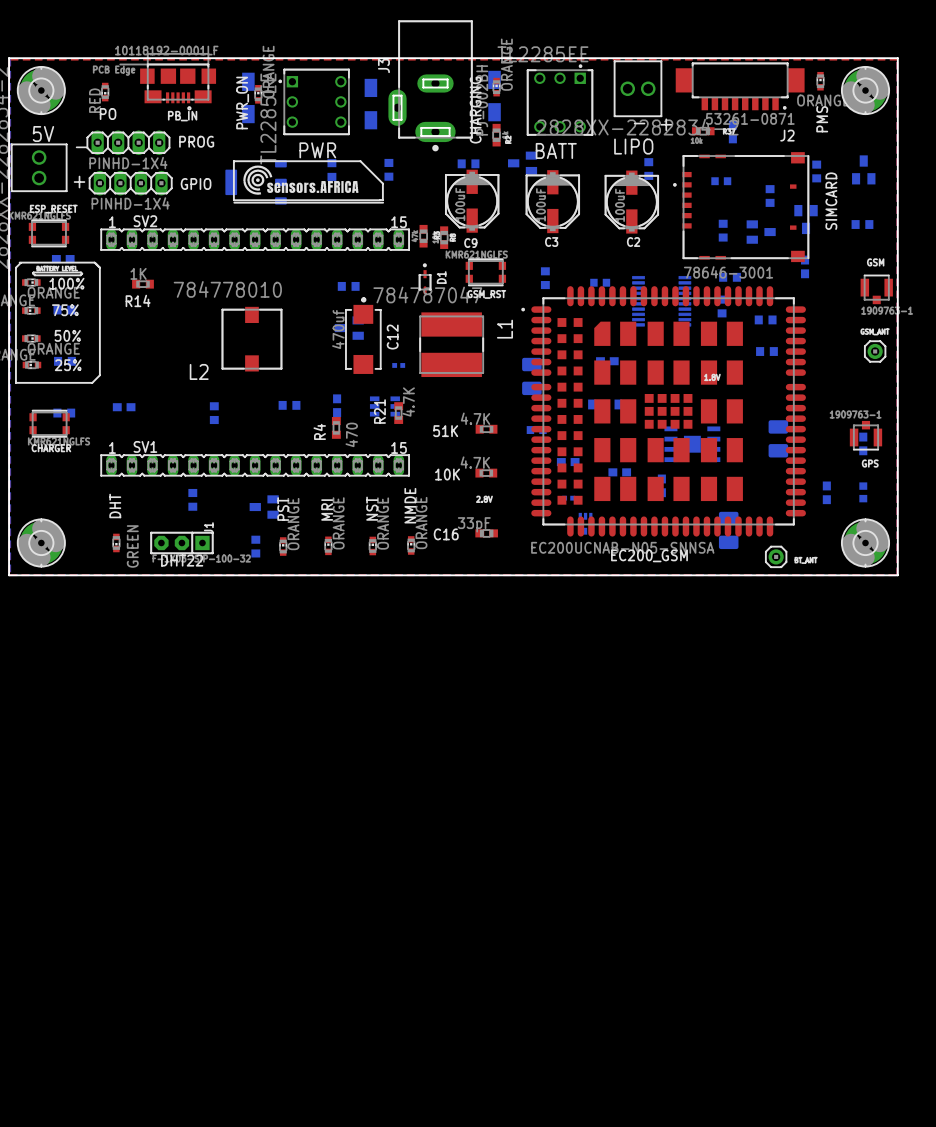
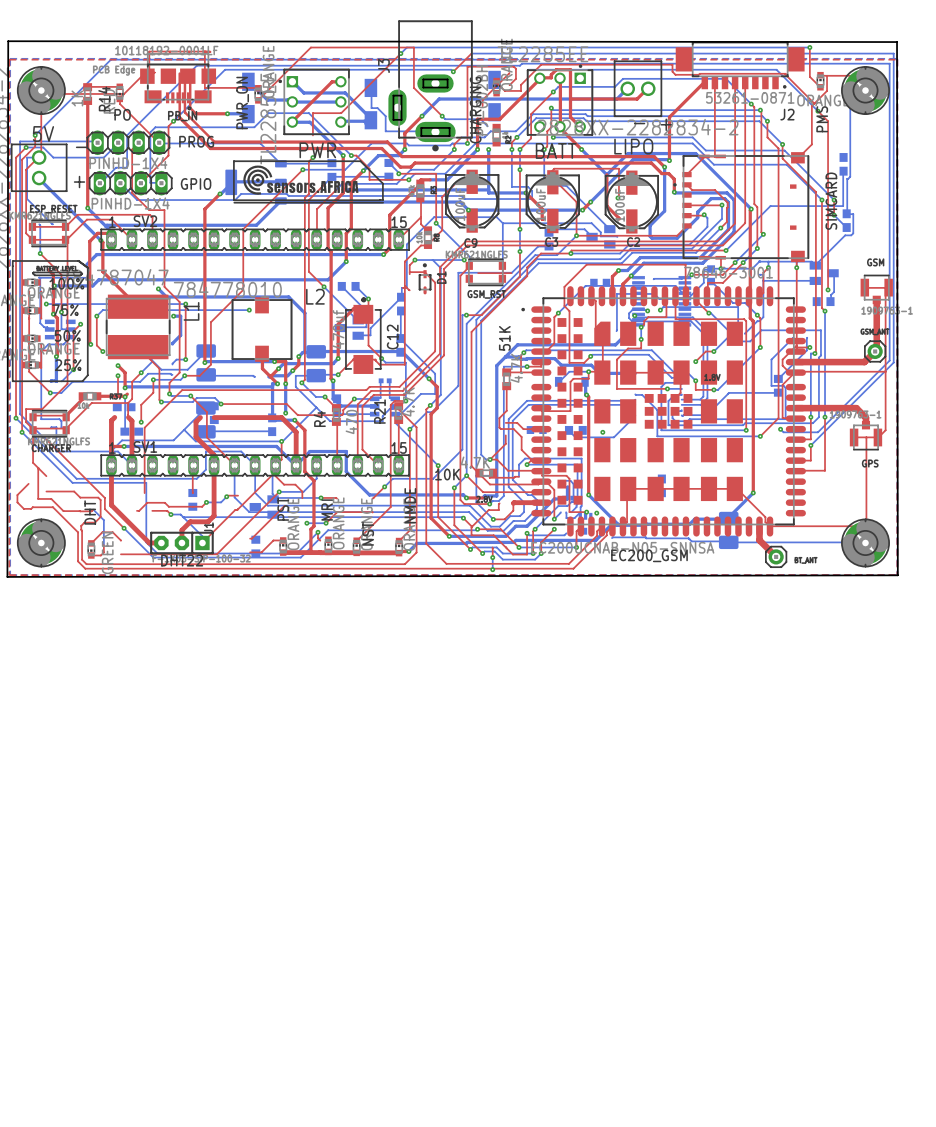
top track: none -> (809, 47) (809, 76) (820, 87)
bottom track: none -> (809, 47) (406, 47) (400, 53)
via: none -> (809, 47)
top track: none -> (400, 53) (341, 113) (312, 113) (312, 135)
via: none -> (400, 53)
top track: none -> (471, 53) (453, 71)
bottom track: none -> (471, 53) (893, 53) (893, 362) (810, 445)
board edge: (9, 58) (897, 58) (897, 575) (9, 575) (9, 58) -> (8, 41) (7, 576) (897, 575) (897, 42) (8, 41)
bottom track: none -> (517, 59) (110, 59) (35, 135)
bottom track: none -> (528, 69) (776, 69) (817, 111)
bottom track: none -> (453, 71) (451, 69) (225, 69) (173, 121)
via: none -> (453, 71)
top track: none -> (179, 73) (179, 117) (210, 148) (381, 148) (400, 167) (410, 167) (414, 163) (651, 163) (661, 173) (668, 173) (674, 179) (674, 192)
top track: none -> (184, 73) (184, 112) (214, 142) (387, 142) (402, 156) (654, 156) (664, 167)
top track: none -> (190, 73) (190, 107) (195, 113) (227, 113)
top track: none -> (509, 73) (482, 100) (482, 106)
top track: none -> (820, 75) (865, 75) (865, 90)
top track: none -> (827, 75) (827, 90) (811, 106) (811, 144) (797, 157)
top track: none -> (560, 78) (560, 128) (581, 149)
bottom track: none -> (248, 81) (267, 100) (340, 101)
bottom track: none -> (292, 81) (303, 92) (345, 92) (370, 120) (369, 122) (340, 122)
top track: none -> (340, 81) (332, 81) (292, 122)
top track: none -> (704, 82) (669, 117) (669, 160)
top track: none -> (714, 82) (714, 156)
top track: none -> (735, 82) (735, 223) (717, 241) (465, 241) (440, 267) (440, 353) (402, 390) (371, 390) (357, 404) (357, 465)
top track: none -> (745, 82) (745, 223) (722, 245) (467, 245) (444, 268) (444, 355) (404, 394) (373, 394) (362, 406) (362, 449) (378, 465)
top track: none -> (498, 84) (504, 90) (521, 90) (521, 84) (541, 64) (672, 64) (672, 71) (675, 74) (785, 73) (814, 103)
top track: none -> (509, 85) (515, 78) (515, 68) (513, 66) (467, 66) (467, 143)
top track: none -> (119, 86) (87, 87)
J2 position: (740, 86) -> (740, 65)
bottom track: none -> (370, 87) (371, 108) (377, 108) (385, 116) (385, 131) (435, 131)
top track: none -> (258, 88) (204, 87) (204, 72) (204, 71) (204, 51) (210, 51) (209, 51) (189, 51) (189, 51) (149, 51) (149, 51) (149, 52) (149, 72) (154, 72) (154, 72) (145, 72) (120, 98) (120, 104) (159, 142)
bottom track: none -> (627, 88) (616, 99) (439, 99) (422, 116)
top track: none -> (648, 88) (637, 99) (570, 99)
bottom track: none -> (865, 90) (850, 90) (850, 176) (847, 178) (846, 213) (853, 214) (853, 233) (851, 235) (845, 235) (815, 265) (811, 261) (759, 260) (752, 268) (703, 269) (703, 282) (687, 299) (659, 299) (653, 293) (616, 293) (616, 331)
top track: none -> (553, 91) (531, 114) (531, 138) (520, 149)
bottom track: none -> (553, 91) (558, 86) (614, 86) (623, 78) (726, 78) (751, 104)
via: none -> (553, 91)
PO position: (105, 92) -> (119, 92)
top track: none -> (123, 94) (123, 93) (41, 93) (41, 90) (41, 90) (41, 154) (26, 169) (26, 233) (32, 239) (66, 239) (86, 219) (111, 219) (131, 239)
top track: none -> (258, 100) (310, 47) (413, 47) (413, 87) (442, 116)
top track: none -> (87, 101) (87, 208)
top track: none -> (751, 104) (754, 107) (754, 204) (757, 207) (757, 248)
via: none -> (751, 104)
top track: none -> (551, 108) (551, 127) (547, 131) (547, 146) (544, 149)
bottom track: none -> (551, 108) (553, 110) (760, 110)
via: none -> (551, 108)
top track: none -> (760, 110) (761, 232) (763, 234)
via: none -> (760, 110)
top track: none -> (817, 111) (828, 121) (828, 289)
via: none -> (817, 111)
bottom track: none -> (227, 113) (248, 114)
via: none -> (227, 113)
top track: none -> (422, 116) (404, 133) (404, 149)
via: none -> (422, 116)
bottom track: none -> (442, 116) (445, 119) (480, 119) (487, 126)
via: none -> (442, 116)
top track: none -> (173, 121) (168, 126) (168, 155) (140, 183)
via: none -> (173, 121)
top track: none -> (767, 121) (767, 137) (778, 148) (778, 418) (760, 436)
bottom track: none -> (767, 121) (762, 116) (587, 116) (585, 114) (533, 114) (515, 131) (490, 131) (484, 137) (461, 137)
via: none -> (767, 121)
bottom track: none -> (292, 122) (309, 122) (343, 155)
top track: none -> (580, 126) (570, 117) (570, 69) (556, 69) (551, 74) (551, 77) (540, 77) (499, 119) (477, 119) (477, 149)
part position: (703, 131) -> (90, 396)
part: (732, 132) -> none
top track: none -> (35, 135) (35, 146) (22, 159) (22, 432)
via: none -> (35, 135)
top track: none -> (461, 137) (454, 144) (454, 149)
top track: none -> (516, 137) (511, 142) (511, 149)
bottom track: none -> (516, 137) (536, 118) (583, 118) (586, 121) (759, 121) (782, 144)
via: none -> (516, 137)
bottom track: none -> (553, 137) (692, 137) (705, 150) (784, 150) (834, 200)
via: none -> (553, 137)
bottom track: none -> (97, 142) (20, 141) (20, 414) (46, 439)
bottom track: none -> (118, 142) (103, 157) (53, 157) (43, 147) (26, 147)
top track: none -> (138, 142) (132, 149) (132, 192) (149, 210) (164, 210) (164, 286) (179, 302) (179, 372) (169, 382) (169, 393)
bottom track: none -> (159, 142) (260, 143) (280, 163) (331, 163)
bottom track: none -> (467, 143) (452, 143) (450, 145) (371, 143) (345, 169) (302, 169)
via: none -> (467, 143)
top track: none -> (782, 144) (782, 158) (815, 191) (814, 353)
via: none -> (782, 144)
top track: none -> (26, 147) (16, 157) (16, 418)
via: none -> (26, 147)
bottom track: none -> (404, 149) (398, 155) (378, 155) (363, 170)
via: none -> (404, 149)
bottom track: none -> (454, 149) (434, 169) (410, 169) (396, 183) (342, 183) (336, 189)
via: none -> (454, 149)
bottom track: none -> (477, 149) (447, 179) (430, 179)
via: none -> (477, 149)
bottom track: none -> (488, 149) (488, 192) (526, 192)
via: none -> (488, 149)
bottom track: none -> (511, 149) (511, 186) (528, 186) (532, 190) (532, 199) (464, 199) (461, 195) (288, 195) (286, 193) (241, 193) (235, 200) (137, 200) (120, 183)
via: none -> (511, 149)
bottom track: none -> (520, 149) (520, 169)
via: none -> (520, 149)
bottom track: none -> (544, 149) (544, 177) (552, 185) (566, 185) (609, 229)
via: none -> (544, 149)
via: none -> (552, 149)
bottom track: none -> (581, 149) (606, 174) (628, 153) (695, 153) (751, 209)
via: none -> (581, 149)
top track: none -> (343, 155) (343, 192) (328, 208) (328, 248) (331, 251) (331, 378) (333, 380)
via: none -> (343, 155)
top track: none -> (351, 155) (356, 155) (369, 168) (369, 179) (408, 179)
bottom track: none -> (351, 155) (308, 113) (268, 113) (254, 127) (155, 127) (150, 132) (150, 182) (161, 183)
via: none -> (351, 155)
top track: none -> (720, 156) (703, 156) (686, 174)
bottom track: none -> (39, 157) (27, 157) (27, 199) (53, 224)
top track: none -> (312, 157) (308, 161) (308, 193) (304, 198) (304, 379) (301, 382)
via: none -> (312, 157)
bottom track: none -> (669, 160) (633, 159) (590, 202)
via: none -> (669, 160)
bottom track: none -> (388, 162) (398, 173)
part: (468, 163) -> none
part: (522, 163) -> none
part: none -> (843, 164)
bottom track: none -> (664, 167) (664, 211) (650, 225) (650, 236) (651, 238) (677, 238) (697, 217) (697, 212) (711, 198) (724, 198) (728, 202) (728, 229) (700, 257) (640, 257) (627, 270) (618, 270)
via: none -> (664, 167)
top track: none -> (302, 169) (243, 229) (243, 289) (210, 322) (210, 364) (199, 375) (184, 375)
via: none -> (302, 169)
top track: none -> (520, 169) (520, 229)
via: none -> (520, 169)
part: (648, 169) -> none
part: (863, 169) -> none
top track: none -> (363, 170) (351, 182) (351, 228) (346, 233) (346, 261)
via: none -> (363, 170)
part: (816, 171) -> none
bottom track: none -> (843, 171) (843, 206) (770, 206) (726, 250)
top track: none -> (398, 173) (436, 173) (436, 223)
via: none -> (398, 173)
top track: none -> (606, 174) (606, 206) (619, 218)
bottom track: none -> (388, 176) (332, 176) (324, 184)
bottom track: none -> (39, 178) (100, 240)
bottom track: none -> (408, 179) (414, 173) (445, 173) (475, 143) (692, 143) (713, 164) (786, 164) (821, 200)
via: none -> (408, 179)
top track: none -> (430, 179) (421, 179) (420, 184) (389, 215) (389, 248) (383, 254)
top track: none -> (554, 179) (576, 202) (576, 235) (677, 235) (686, 225)
top track: none -> (543, 180) (554, 168) (618, 168) (617, 198)
part rotation: 0° (721, 181) -> 90° clockwise (711, 275)
part position: (721, 181) -> (711, 275)
bottom track: none -> (280, 182) (232, 181) (220, 193)
top track: none -> (457, 182) (442, 196) (442, 230) (428, 244)
bottom track: none -> (99, 183) (116, 167) (127, 167) (127, 135) (196, 65) (889, 63) (889, 360) (817, 432) (783, 432) (780, 429)
top track: none -> (324, 184) (308, 200) (308, 271) (324, 286)
top track: none -> (686, 184) (692, 190) (715, 190) (727, 202) (726, 222) (720, 228)
top track: none -> (336, 189) (316, 209) (316, 239)
bottom track: none -> (344, 189) (488, 189)
top track: none -> (526, 192) (542, 209) (543, 219)
via: none -> (526, 192)
bottom track: none -> (674, 192) (727, 192) (734, 200) (734, 231) (702, 263) (643, 263) (631, 275)
via: none -> (674, 192)
top track: none -> (220, 193) (204, 209) (204, 362)
via: none -> (220, 193)
part: (770, 196) -> none
top track: none -> (420, 197) (421, 224) (428, 230)
via: none -> (617, 198)
top track: none -> (821, 200) (821, 308) (825, 311)
via: none -> (821, 200)
top track: none -> (834, 200) (834, 215)
via: none -> (834, 200)
top track: none -> (590, 202) (582, 210)
via: none -> (590, 202)
top track: none -> (721, 205) (686, 205)
bottom track: none -> (721, 205) (721, 218) (692, 248) (630, 248) (620, 259) (536, 259) (476, 319) (476, 502) (493, 519)
via: none -> (721, 205)
bottom track: none -> (87, 208) (110, 231) (111, 239)
via: none -> (87, 208)
top track: none -> (751, 209) (748, 296) (750, 318) (753, 321) (753, 492)
via: none -> (751, 209)
via: none -> (468, 210)
bottom track: none -> (582, 210) (468, 210) (460, 202) (280, 200) (256, 225) (105, 226)
via: none -> (582, 210)
top track: none -> (704, 214) (686, 215)
bottom track: none -> (704, 214) (707, 218) (707, 226) (689, 244) (629, 244) (620, 253) (570, 253)
via: none -> (704, 214)
bottom track: none -> (834, 215) (846, 227)
via: none -> (834, 215)
top track: none -> (421, 217) (398, 239)
part: (806, 219) -> none
part: none -> (846, 220)
bottom track: none -> (436, 223) (470, 257) (469, 266)
via: none -> (436, 223)
bottom track: none -> (502, 223) (502, 266)
bottom track: none -> (502, 223) (591, 223) (600, 232) (600, 236) (617, 236)
bottom track: none -> (502, 223) (496, 217) (434, 217) (406, 244) (406, 287) (401, 287) (401, 296) (370, 328) (370, 335) (358, 335)
bottom track: none -> (39, 224) (40, 253)
part: (862, 224) -> none
top track: none -> (32, 226) (65, 226) (77, 214) (149, 214) (152, 217) (152, 239)
bottom track: none -> (720, 228) (696, 252) (632, 252) (621, 263) (538, 263) (481, 320) (481, 454) (486, 459) (490, 459)
via: none -> (720, 228)
bottom track: none -> (520, 229) (520, 251)
via: none -> (520, 229)
part: (723, 230) -> none
bottom track: none -> (549, 232) (552, 229) (584, 229) (592, 236)
part: (761, 232) -> none
bottom track: none -> (763, 234) (735, 262)
via: none -> (763, 234)
bottom track: none -> (576, 235) (557, 255) (535, 255) (466, 323) (466, 475) (454, 487)
via: none -> (576, 235)
part position: (423, 236) -> (420, 190)
part: none -> (600, 236)
part position: (444, 237) -> (428, 237)
top track: none -> (65, 239) (67, 241) (67, 383) (42, 409) (26, 409) (26, 422) (33, 428)
top track: none -> (111, 239) (110, 233) (97, 233) (89, 241) (90, 344)
top track: none -> (100, 240) (102, 242) (102, 271) (138, 306)
via: none -> (100, 240)
top track: none -> (428, 244) (421, 245) (404, 261) (404, 285) (409, 290)
bottom track: none -> (549, 246) (538, 246) (511, 272) (458, 272) (458, 385) (432, 412) (427, 412) (409, 429)
bottom track: none -> (757, 248) (743, 262)
via: none -> (757, 248)
top track: none -> (726, 250) (571, 250) (570, 253) (541, 253) (527, 267) (527, 276) (471, 331) (471, 466) (489, 484) (538, 484) (541, 481) (546, 481) (554, 489) (554, 519)
via: none -> (726, 250)
top track: none -> (520, 251) (520, 276) (481, 315) (466, 315)
via: none -> (520, 251)
top track: none -> (40, 253) (61, 274) (61, 312)
via: none -> (40, 253)
via: none -> (570, 253)
bottom track: none -> (383, 254) (96, 254) (86, 264)
via: none -> (383, 254)
top track: none -> (797, 256) (795, 351)
top track: none -> (704, 257) (720, 257) (720, 268)
part: (63, 259) -> none
line: none -> (13, 260) (78, 260) (87, 267)
line: none -> (78, 260) (87, 267) (87, 375) (82, 381) (12, 381) (12, 261)
top track: none -> (414, 260) (409, 265) (409, 274)
bottom track: none -> (414, 260) (464, 260)
via: none -> (414, 260)
bottom track: none -> (432, 260) (440, 268) (440, 394) (430, 405)
via: none -> (464, 260)
bottom track: none -> (346, 261) (328, 279) (98, 279) (92, 285) (54, 285)
via: none -> (346, 261)
bottom track: none -> (768, 261) (768, 267)
line: (19, 262) (94, 262) (99, 267) -> none
line: (20, 262) (15, 267) (15, 382) (92, 382) (99, 375) (99, 267) (95, 263) -> none
top track: none -> (735, 262) (723, 274) (691, 274)
via: none -> (735, 262)
top track: none -> (743, 262) (723, 282) (707, 282) (706, 296)
via: none -> (743, 262)
top track: none -> (469, 266) (460, 275) (460, 499) (464, 504) (489, 504)
part: (805, 266) -> none
top track: none -> (768, 267) (763, 272) (763, 292) (759, 296)
via: none -> (768, 267)
via: none -> (796, 267)
via: none -> (720, 268)
top track: none -> (48, 269) (53, 274) (53, 314) (57, 318) (56, 356)
top track: none -> (618, 270) (612, 276) (612, 296)
via: none -> (618, 270)
top track: none -> (409, 272) (424, 272) (435, 282) (435, 351) (399, 386) (369, 386) (366, 390) (182, 390) (144, 427) (144, 493)
top track: none -> (478, 273) (511, 273)
part: none -> (824, 273)
bottom track: none -> (833, 273) (834, 291) (831, 294) (830, 301)
bottom track: none -> (691, 274) (688, 277) (681, 278) (653, 279)
via: none -> (691, 274)
bottom track: none -> (759, 274) (763, 274) (763, 317) (744, 333)
top track: none -> (631, 275) (622, 284) (622, 296)
via: none -> (631, 275)
part: (730, 277) -> none
bottom track: none -> (86, 278) (39, 277) (40, 323) (49, 329)
part position: (545, 278) -> (549, 239)
bottom track: none -> (763, 280) (815, 280)
bottom track: none -> (711, 281) (733, 303) (745, 303) (757, 315)
R14 rotation: 0° (142, 284) -> 90° clockwise (87, 94)
R14 position: (142, 284) -> (87, 94)
via: none -> (54, 285)
bottom track: none -> (324, 286) (358, 320)
via: none -> (324, 286)
bottom track: none -> (341, 286) (366, 311) (366, 327) (340, 328)
bottom track: none -> (355, 286) (368, 299)
top track: none -> (405, 286) (404, 364) (379, 364) (375, 359) (353, 358) (338, 374)
top track: none -> (402, 287) (404, 287)
top track: none -> (864, 287) (888, 287) (885, 287) (885, 430) (878, 437) (854, 437)
bottom track: none -> (158, 288) (166, 296) (288, 296) (304, 313) (304, 352)
via: none -> (158, 288)
via: none -> (828, 289)
top track: none -> (29, 291) (29, 371) (50, 392)
top track: none -> (41, 291) (41, 318)
bottom track: none -> (682, 292) (675, 285) (585, 285) (558, 313)
top track: none -> (591, 296) (595, 301) (595, 327) (602, 334) (602, 371) (588, 371) (588, 378) (573, 378) (570, 381) (570, 411) (542, 411) (541, 408) (541, 418)
top track: none -> (664, 296) (666, 317) (648, 317) (641, 327)
top track: none -> (675, 296) (675, 319) (744, 319) (746, 321) (746, 430)
top track: none -> (685, 296) (685, 264) (586, 264) (564, 286) (564, 306) (569, 311) (569, 362) (584, 362) (590, 356)
top track: none -> (696, 296) (696, 301) (708, 313)
top track: none -> (368, 299) (368, 345) (381, 358)
via: none -> (368, 299)
top track: none -> (876, 299) (876, 349) (864, 362) (795, 362)
R14 name position: R14 (138, 300) -> R14 (104, 98)
part: none -> (823, 301)
bottom track: none -> (46, 304) (185, 304)
via: none -> (46, 304)
top track: none -> (185, 304) (185, 359)
via: none -> (185, 304)
part: none -> (401, 304)
part: (722, 306) -> none
top track: none -> (353, 308) (338, 324) (338, 358)
part: (64, 310) -> none
bottom track: none -> (249, 310) (102, 310) (96, 316)
via: none -> (249, 310)
bottom track: none -> (401, 310) (400, 338) (435, 373) (435, 393) (421, 393) (400, 414) (395, 414) (395, 423) (438, 465)
bottom track: none -> (647, 310) (632, 310) (629, 313) (629, 318) (632, 321) (691, 321) (703, 333) (703, 396) (700, 399) (681, 399)
via: none -> (647, 310)
bottom track: none -> (660, 310) (663, 307) (738, 307) (738, 339) (740, 341) (750, 341) (761, 330) (820, 330) (818, 417) (812, 423) (668, 425) (668, 401) (674, 394) (681, 394)
via: none -> (660, 310)
bottom track: none -> (825, 311) (825, 417)
via: none -> (825, 311)
bottom track: none -> (61, 312) (61, 329) (70, 329)
via: none -> (61, 312)
top track: none -> (558, 313) (554, 317) (554, 343) (546, 351) (541, 351)
via: none -> (558, 313)
bottom track: none -> (708, 313) (731, 333) (713, 351)
via: none -> (708, 313)
via: none -> (53, 314)
bottom track: none -> (466, 315) (462, 315) (462, 449) (433, 478) (392, 478) (384, 486)
via: none -> (466, 315)
bottom track: none -> (634, 315) (636, 317) (692, 317) (707, 331) (707, 398) (700, 404) (681, 404)
via: none -> (634, 315)
top track: none -> (757, 315) (760, 318) (760, 347)
via: none -> (757, 315)
top track: none -> (96, 316) (96, 345) (102, 351)
via: none -> (96, 316)
bottom track: none -> (173, 316) (180, 316) (180, 335) (172, 344)
via: none -> (173, 316)
part: (765, 319) -> none
top track: none -> (80, 324) (73, 331) (73, 369)
via: none -> (80, 324)
bottom track: none -> (641, 327) (641, 339)
via: none -> (641, 327)
part: none -> (60, 329)
bottom track: none -> (629, 331) (615, 344) (517, 344) (496, 365) (496, 495) (484, 495) (482, 497)
bottom track: none -> (70, 337) (63, 344) (48, 344) (41, 351) (41, 419) (59, 419) (61, 427)
bottom track: none -> (793, 337) (771, 359) (771, 385) (783, 385) (785, 387) (785, 419) (689, 419) (687, 421) (675, 421) (672, 418) (672, 411) (681, 410)
bottom track: none -> (807, 337) (806, 350) (778, 378)
L2 position: (251, 339) -> (262, 329)
top track: none -> (641, 339) (641, 348) (628, 348) (616, 359) (616, 388) (667, 388)
via: none -> (641, 339)
top track: none -> (41, 344) (41, 368)
via: none -> (90, 344)
L1 position: (451, 344) -> (138, 326)
part: none -> (400, 345)
top track: none -> (796, 345) (782, 359) (782, 365) (791, 374) (795, 372)
top track: none -> (138, 347) (159, 368) (159, 400) (161, 402)
bottom track: none -> (760, 347) (717, 389) (713, 389)
via: none -> (760, 347)
top track: none -> (796, 347) (809, 347)
via: none -> (809, 347)
top track: none -> (41, 350) (50, 350)
via: none -> (102, 351)
bottom track: none -> (206, 351) (187, 369) (161, 369) (151, 359) (152, 361) (141, 372)
top track: none -> (713, 351) (705, 351) (695, 361)
via: none -> (713, 351)
part: (766, 351) -> none
top track: none -> (523, 352) (521, 355) (521, 372)
bottom track: none -> (523, 352) (526, 350) (651, 350) (674, 372) (687, 372) (695, 380)
via: none -> (523, 352)
top track: none -> (262, 353) (262, 368) (277, 383)
bottom track: none -> (814, 353) (810, 353) (810, 417)
via: none -> (814, 353)
bottom track: none -> (56, 356) (56, 381)
via: none -> (56, 356)
top track: none -> (298, 356) (298, 364) (292, 370)
bottom track: none -> (298, 356) (302, 352) (316, 351) (399, 351) (429, 378)
via: none -> (298, 356)
bottom track: none -> (505, 356) (518, 356) (521, 359) (554, 358) (561, 365) (591, 365) (599, 373) (635, 373)
bottom track: none -> (590, 356) (592, 354) (648, 354) (671, 377) (681, 378)
via: none -> (590, 356)
bottom track: none -> (338, 358) (333, 363) (283, 363) (278, 368)
via: none -> (338, 358)
bottom track: none -> (381, 358) (385, 362) (405, 362) (405, 401)
via: none -> (381, 358)
bottom track: none -> (185, 359) (176, 359) (172, 364)
via: none -> (185, 359)
part: (64, 361) -> none
top track: none -> (274, 361) (285, 361) (285, 383)
bottom track: none -> (274, 361) (204, 362)
via: none -> (274, 361)
part: (607, 361) -> none
via: none -> (695, 361)
via: none -> (204, 362)
part: none -> (206, 362)
top track: none -> (541, 362) (541, 366) (527, 366)
part: none -> (316, 363)
top track: none -> (118, 365) (125, 372) (125, 387)
via: none -> (118, 365)
part position: (398, 365) -> (385, 380)
bottom track: none -> (527, 366) (503, 366) (503, 495) (498, 501) (492, 501) (489, 504)
via: none -> (527, 366)
top track: none -> (278, 368) (270, 376)
via: none -> (278, 368)
bottom track: none -> (73, 369) (61, 381)
via: none -> (73, 369)
bottom track: none -> (292, 370) (287, 375) (268, 376)
via: none -> (292, 370)
L2 name position: L2 (199, 371) -> L2 (315, 296)
bottom track: none -> (588, 371) (569, 371) (558, 381)
via: none -> (588, 371)
top track: none -> (885, 371) (795, 372)
top track: none -> (141, 372) (132, 381) (132, 398) (128, 403)
via: none -> (141, 372)
top track: none -> (506, 372) (541, 372)
top track: none -> (628, 372) (680, 372) (680, 392) (675, 398)
top track: none -> (795, 372) (782, 384) (782, 418) (795, 418)
bottom track: none -> (172, 374) (148, 373) (140, 381) (72, 381) (61, 392) (50, 392)
bottom track: none -> (206, 374) (255, 376)
bottom track: none -> (338, 374) (295, 375) (295, 386) (330, 421) (382, 421) (382, 416) (395, 406)
via: none -> (338, 374)
top track: none -> (118, 375) (118, 396)
via: none -> (118, 375)
bottom track: none -> (184, 375) (180, 379) (153, 379)
via: none -> (184, 375)
part: (531, 376) -> none
top track: none -> (429, 378) (437, 386) (437, 408) (431, 414) (431, 518) (449, 536)
via: none -> (429, 378)
top track: none -> (153, 379) (153, 392) (141, 404) (141, 422)
via: none -> (153, 379)
bottom track: none -> (56, 380) (51, 381)
bottom track: none -> (333, 380) (333, 398) (341, 406) (374, 406)
via: none -> (333, 380)
bottom track: none -> (381, 380) (380, 397) (354, 398)
bottom track: none -> (389, 380) (389, 397) (395, 398)
top track: none -> (695, 380) (695, 389) (713, 389)
via: none -> (695, 380)
bottom track: none -> (585, 381) (586, 394)
bottom track: none -> (301, 382) (315, 396) (325, 396)
via: none -> (301, 382)
bottom track: none -> (277, 383) (272, 383) (272, 417) (275, 420) (294, 420)
via: none -> (277, 383)
bottom track: none -> (285, 383) (285, 413)
via: none -> (285, 383)
bottom track: none -> (681, 383) (665, 382) (661, 386) (661, 430) (746, 430)
part: none -> (778, 385)
bottom track: none -> (272, 386) (125, 387)
top track: none -> (506, 386) (506, 410) (499, 418) (499, 427) (513, 429) (521, 436) (521, 449) (532, 460) (541, 460)
via: none -> (125, 387)
bottom track: none -> (667, 388) (681, 389)
via: none -> (667, 388)
via: none -> (713, 389)
via: none -> (50, 392)
bottom track: none -> (778, 392) (729, 392) (706, 415) (681, 415)
bottom track: none -> (169, 393) (171, 395) (190, 395)
via: none -> (169, 393)
top track: none -> (127, 394) (125, 396) (96, 396)
top track: none -> (586, 394) (588, 396) (588, 494)
via: none -> (586, 394)
bottom track: none -> (635, 394) (642, 394) (657, 410) (657, 436) (760, 436)
top track: none -> (190, 395) (206, 412) (206, 437) (234, 465)
via: none -> (190, 395)
top track: none -> (83, 396) (83, 398) (66, 415) (33, 415)
bottom track: none -> (125, 396) (124, 431)
via: none -> (125, 396)
top track: none -> (325, 396) (336, 408)
via: none -> (325, 396)
top track: none -> (354, 398) (343, 410) (342, 415) (297, 415) (286, 404) (221, 404)
via: none -> (354, 398)
bottom track: none -> (635, 399) (527, 400) (508, 419) (508, 487) (524, 502) (524, 512) (520, 516) (510, 516) (499, 526) (490, 526) (469, 505) (267, 505) (255, 492) (255, 465) (241, 451) (205, 451) (205, 469) (196, 478) (76, 478) (16, 418)
top track: none -> (405, 401) (394, 401) (390, 405) (390, 507) (356, 540)
via: none -> (405, 401)
bottom track: none -> (161, 402) (192, 402) (196, 397) (214, 397) (221, 404)
via: none -> (161, 402)
top track: none -> (128, 403) (91, 403) (66, 428) (33, 428)
top track: none -> (128, 403) (128, 417) (131, 420) (131, 465)
via: none -> (221, 404)
part position: (604, 404) -> (571, 381)
bottom track: none -> (635, 404) (528, 404) (512, 420) (512, 479) (528, 495) (532, 495) (536, 499) (536, 508) (524, 521) (513, 521) (503, 530) (487, 530) (469, 512) (249, 512) (234, 497) (234, 465)
part: (289, 405) -> none
top track: none -> (430, 405) (426, 409) (426, 543) (446, 563) (568, 563) (597, 535) (597, 531) (601, 526)
via: none -> (430, 405)
bottom track: none -> (316, 407) (282, 441) (195, 441) (184, 429)
bottom track: none -> (205, 408) (173, 440) (122, 440) (110, 451)
top track: none -> (795, 408) (856, 408) (865, 417) (865, 425)
top track: none -> (398, 409) (416, 427) (416, 552) (404, 564) (86, 564) (82, 559) (81, 525) (84, 522) (95, 522) (100, 516) (100, 499) (98, 497) (80, 497) (74, 491) (46, 491)
part: (64, 413) -> none
via: none -> (285, 413)
bottom track: none -> (334, 413) (374, 414)
bottom track: none -> (635, 415) (613, 437) (575, 437) (569, 430)
top track: none -> (114, 417) (111, 420) (111, 505) (149, 542) (161, 542)
top track: none -> (200, 417) (195, 422) (195, 436) (214, 455) (214, 515) (208, 521) (190, 521) (181, 530) (181, 542)
top track: none -> (214, 417) (281, 417) (296, 432) (296, 465)
top track: none -> (810, 417) (810, 439) (795, 439)
via: none -> (810, 417)
top track: none -> (825, 417) (825, 470) (795, 471)
via: none -> (825, 417)
via: none -> (16, 418)
part: none -> (205, 419)
top track: none -> (294, 420) (304, 430) (304, 471) (313, 480) (313, 526) (310, 529) (310, 552)
via: none -> (294, 420)
top track: none -> (336, 421) (337, 465)
via: none -> (141, 422)
top track: none -> (505, 422) (517, 422) (523, 429) (541, 429)
top track: none -> (398, 423) (398, 465)
part: none -> (272, 424)
bottom track: none -> (51, 427) (56, 427) (56, 451) (118, 451) (131, 465)
R4 position: (336, 427) -> (336, 414)
top track: none -> (33, 428) (33, 462) (46, 476)
top track: none -> (409, 429) (409, 530) (399, 541)
via: none -> (409, 429)
51K rotation: 0° (486, 429) -> 90° clockwise (506, 379)
51K position: (486, 429) -> (506, 379)
via: none -> (780, 429)
part: none -> (575, 430)
via: none -> (746, 430)
part: none -> (131, 431)
bottom track: none -> (272, 431) (205, 431)
bottom track: none -> (22, 432) (72, 482) (146, 482) (146, 542) (157, 553) (296, 553) (318, 532)
via: none -> (22, 432)
via: none -> (602, 432)
top track: none -> (505, 435) (505, 443) (490, 459) (496, 459) (508, 470) (536, 470) (542, 471) (542, 475) (566, 475) (569, 478) (569, 512) (586, 512)
via: none -> (760, 436)
top track: none -> (866, 437) (866, 542) (865, 542) (866, 526) (770, 526) (770, 526) (765, 522) (765, 517) (738, 489) (709, 488)
part: (778, 438) -> none
top track: none -> (46, 439) (104, 497) (104, 509) (124, 528)
top track: none -> (281, 441) (281, 459) (275, 465)
via: none -> (281, 441)
part: (863, 443) -> none
part: (692, 444) -> none
top track: none -> (810, 445) (810, 460) (795, 460)
via: none -> (810, 445)
top track: none -> (111, 446) (124, 446)
bottom track: none -> (124, 446) (276, 446) (296, 465) (309, 451) (346, 451) (346, 471) (369, 494) (463, 494) (466, 497)
via: none -> (124, 446)
via: none -> (490, 459)
top track: none -> (531, 459) (527, 464)
part: (568, 462) -> none
bottom track: none -> (527, 464) (577, 464) (577, 504) (571, 512)
via: none -> (527, 464)
top track: none -> (193, 465) (192, 492)
top track: none -> (275, 465) (275, 476) (284, 484) (295, 484) (302, 491) (302, 498)
top track: none -> (275, 465) (275, 471) (202, 542)
bottom track: none -> (275, 465) (272, 465) (272, 493) (276, 497) (321, 497)
bottom track: none -> (316, 465) (316, 478) (303, 491) (279, 491)
top track: none -> (438, 465) (438, 517) (470, 549)
via: none -> (438, 465)
top track: none -> (38, 468) (38, 498) (51, 498) (63, 511) (91, 511) (93, 509)
part: (619, 472) -> none
top track: none -> (466, 475) (483, 492) (541, 492)
via: none -> (466, 475)
top track: none -> (489, 475) (489, 477) (518, 476)
bottom track: none -> (518, 476) (518, 464) (525, 458) (581, 458) (580, 512) (574, 518) (566, 518) (566, 512)
top track: none -> (28, 483) (17, 495) (17, 502) (23, 508) (52, 507) (78, 532) (78, 561) (85, 568) (573, 568) (606, 535) (606, 532) (612, 526)
top track: none -> (384, 486) (372, 498)
via: none -> (384, 486)
bottom track: none -> (559, 486) (560, 480) (570, 480) (573, 483) (573, 502) (567, 506) (558, 506) (535, 529)
bottom track: none -> (567, 486) (567, 498) (554, 498) (527, 526) (515, 526) (505, 536) (449, 536)
top track: none -> (454, 487) (454, 525) (482, 553)
via: none -> (454, 487)
top track: none -> (681, 488) (708, 488)
top track: none -> (681, 488) (628, 488) (627, 522) (622, 526)
top track: none -> (279, 491) (216, 554) (120, 554)
via: none -> (279, 491)
bottom track: none -> (753, 492) (728, 519) (694, 519) (688, 524) (611, 524) (595, 540) (416, 543) (408, 551)
via: none -> (753, 492)
part: (826, 492) -> none
part: (863, 492) -> none
bottom track: none -> (588, 494) (617, 525)
via: none -> (588, 494)
top track: none -> (238, 495) (226, 496)
bottom track: none -> (226, 496) (221, 502) (206, 502)
via: none -> (226, 496)
top track: none -> (321, 497) (337, 498)
via: none -> (321, 497)
top track: none -> (466, 497) (482, 497)
via: none -> (466, 497)
top track: none -> (206, 502) (202, 506) (168, 506) (164, 502) (147, 502) (136, 510)
via: none -> (206, 502)
top track: none -> (541, 502) (514, 502) (513, 510) (504, 519) (493, 519)
top track: none -> (499, 503) (498, 510) (488, 510) (471, 527) (471, 535) (493, 535) (512, 554) (527, 554) (527, 533)
via: none -> (489, 504)
top track: none -> (284, 505) (250, 538)
NST name position: NST (372, 508) -> NST (368, 533)
bottom track: none -> (93, 509) (103, 520) (103, 545)
top track: none -> (152, 510) (167, 510) (170, 514)
top track: none -> (372, 512) (337, 512) (326, 523)
bottom track: none -> (560, 512) (554, 519)
via: none -> (586, 512)
via: none -> (596, 513)
bottom track: none -> (170, 514) (180, 514) (202, 536) (202, 542)
via: none -> (170, 514)
bottom track: none -> (183, 517) (463, 518)
top track: none -> (463, 518) (472, 526)
via: none -> (463, 518)
via: none -> (493, 519)
via: none -> (554, 519)
bottom track: none -> (306, 523) (326, 523)
via: none -> (306, 523)
via: none -> (326, 523)
top track: none -> (580, 526) (576, 531) (576, 547)
top track: none -> (759, 526) (759, 540) (776, 556)
bottom track: none -> (124, 528) (153, 557) (300, 557) (328, 530) (477, 529)
via: none -> (124, 528)
top track: none -> (477, 529) (500, 529) (518, 547)
via: none -> (477, 529)
top track: none -> (535, 529) (533, 531) (533, 553)
via: none -> (535, 529)
top track: none -> (554, 529) (541, 542) (541, 553)
via: none -> (554, 529)
top track: none -> (318, 532) (318, 538) (320, 540)
via: none -> (318, 532)
C16: 33pF (486, 533) -> none
bottom track: none -> (527, 533) (529, 535) (564, 535) (566, 533)
via: none -> (527, 533)
via: none -> (449, 536)
bottom track: none -> (611, 538) (688, 538)
bottom track: none -> (688, 538) (691, 541) (729, 542) (865, 542)
top track: none -> (120, 540) (112, 532) (102, 532) (91, 543)
top track: none -> (283, 540) (273, 540) (261, 552) (250, 552)
DHT position: (116, 542) -> (91, 549)
top track: none -> (103, 545) (103, 552) (100, 555) (91, 555)
NST position: (372, 545) -> (356, 546)
NMDE position: (411, 545) -> (399, 547)
top track: none -> (492, 547) (492, 557)
bottom track: none -> (518, 547) (576, 547)
via: none -> (518, 547)
via: none -> (576, 547)
bottom track: none -> (470, 549) (472, 547) (496, 547) (502, 553) (533, 553)
via: none -> (470, 549)
top track: none -> (408, 551) (399, 553) (320, 552)
via: none -> (408, 551)
top track: none -> (283, 552) (320, 552)
bottom track: none -> (482, 553) (484, 551) (494, 551) (502, 559) (535, 559) (541, 553)
via: none -> (482, 553)
via: none -> (533, 553)
via: none -> (541, 553)
bottom track: none -> (492, 557) (492, 569)
via: none -> (492, 557)
via: none -> (492, 569)

